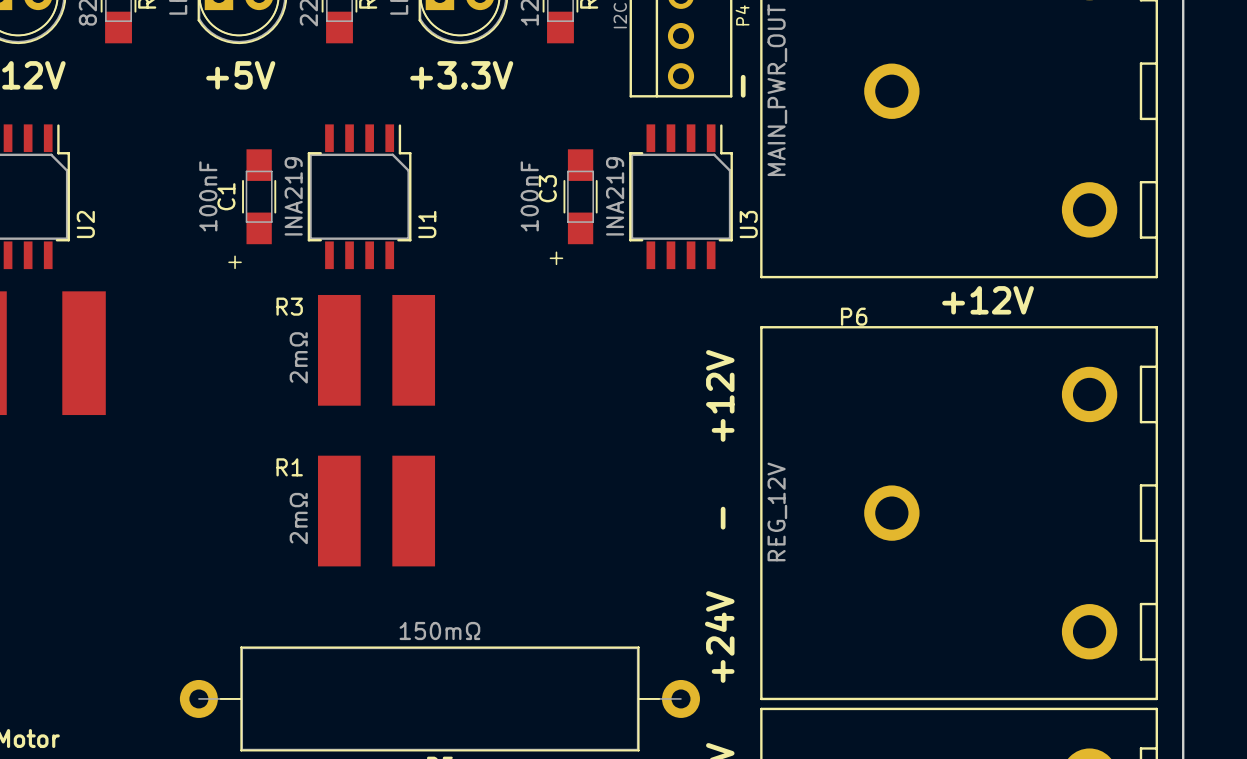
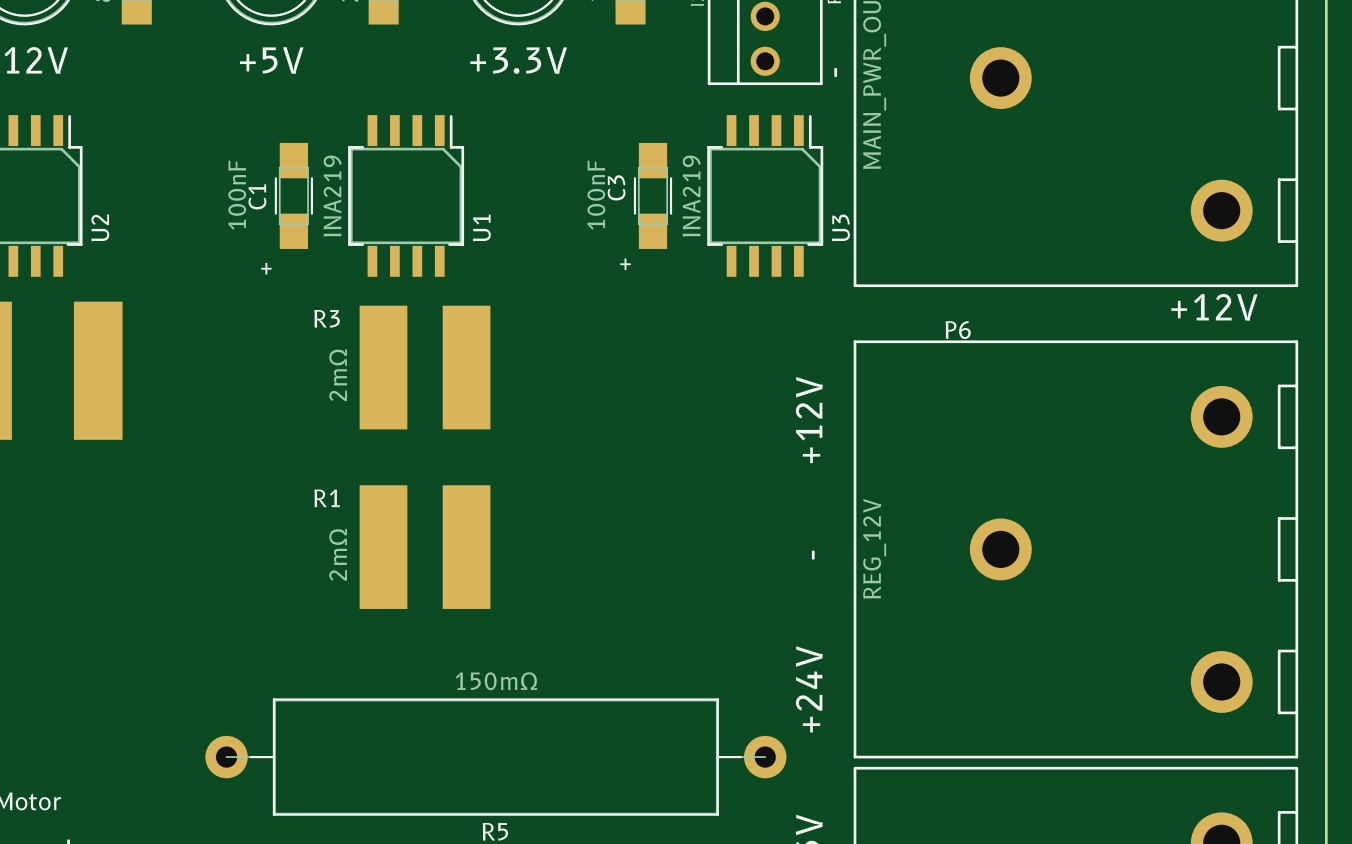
text position: +12V (988, 300) -> +12V (1214, 307)

